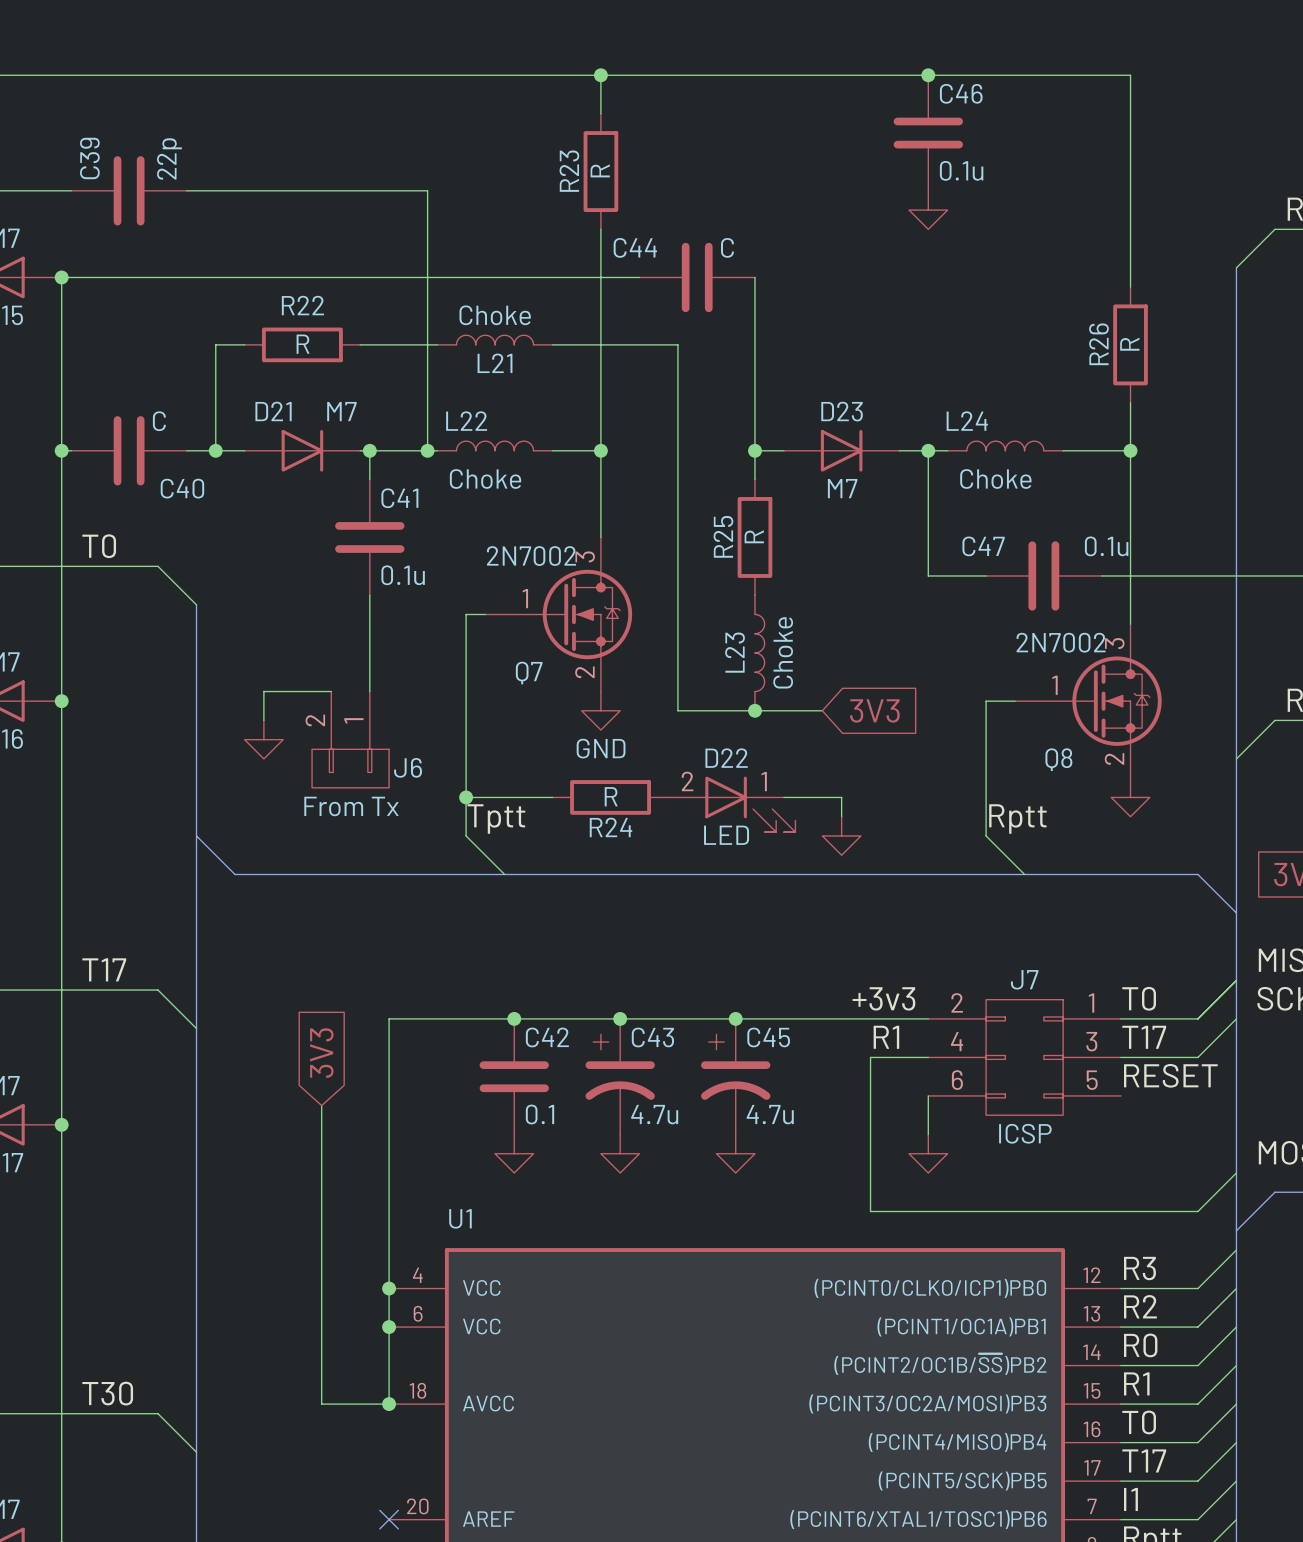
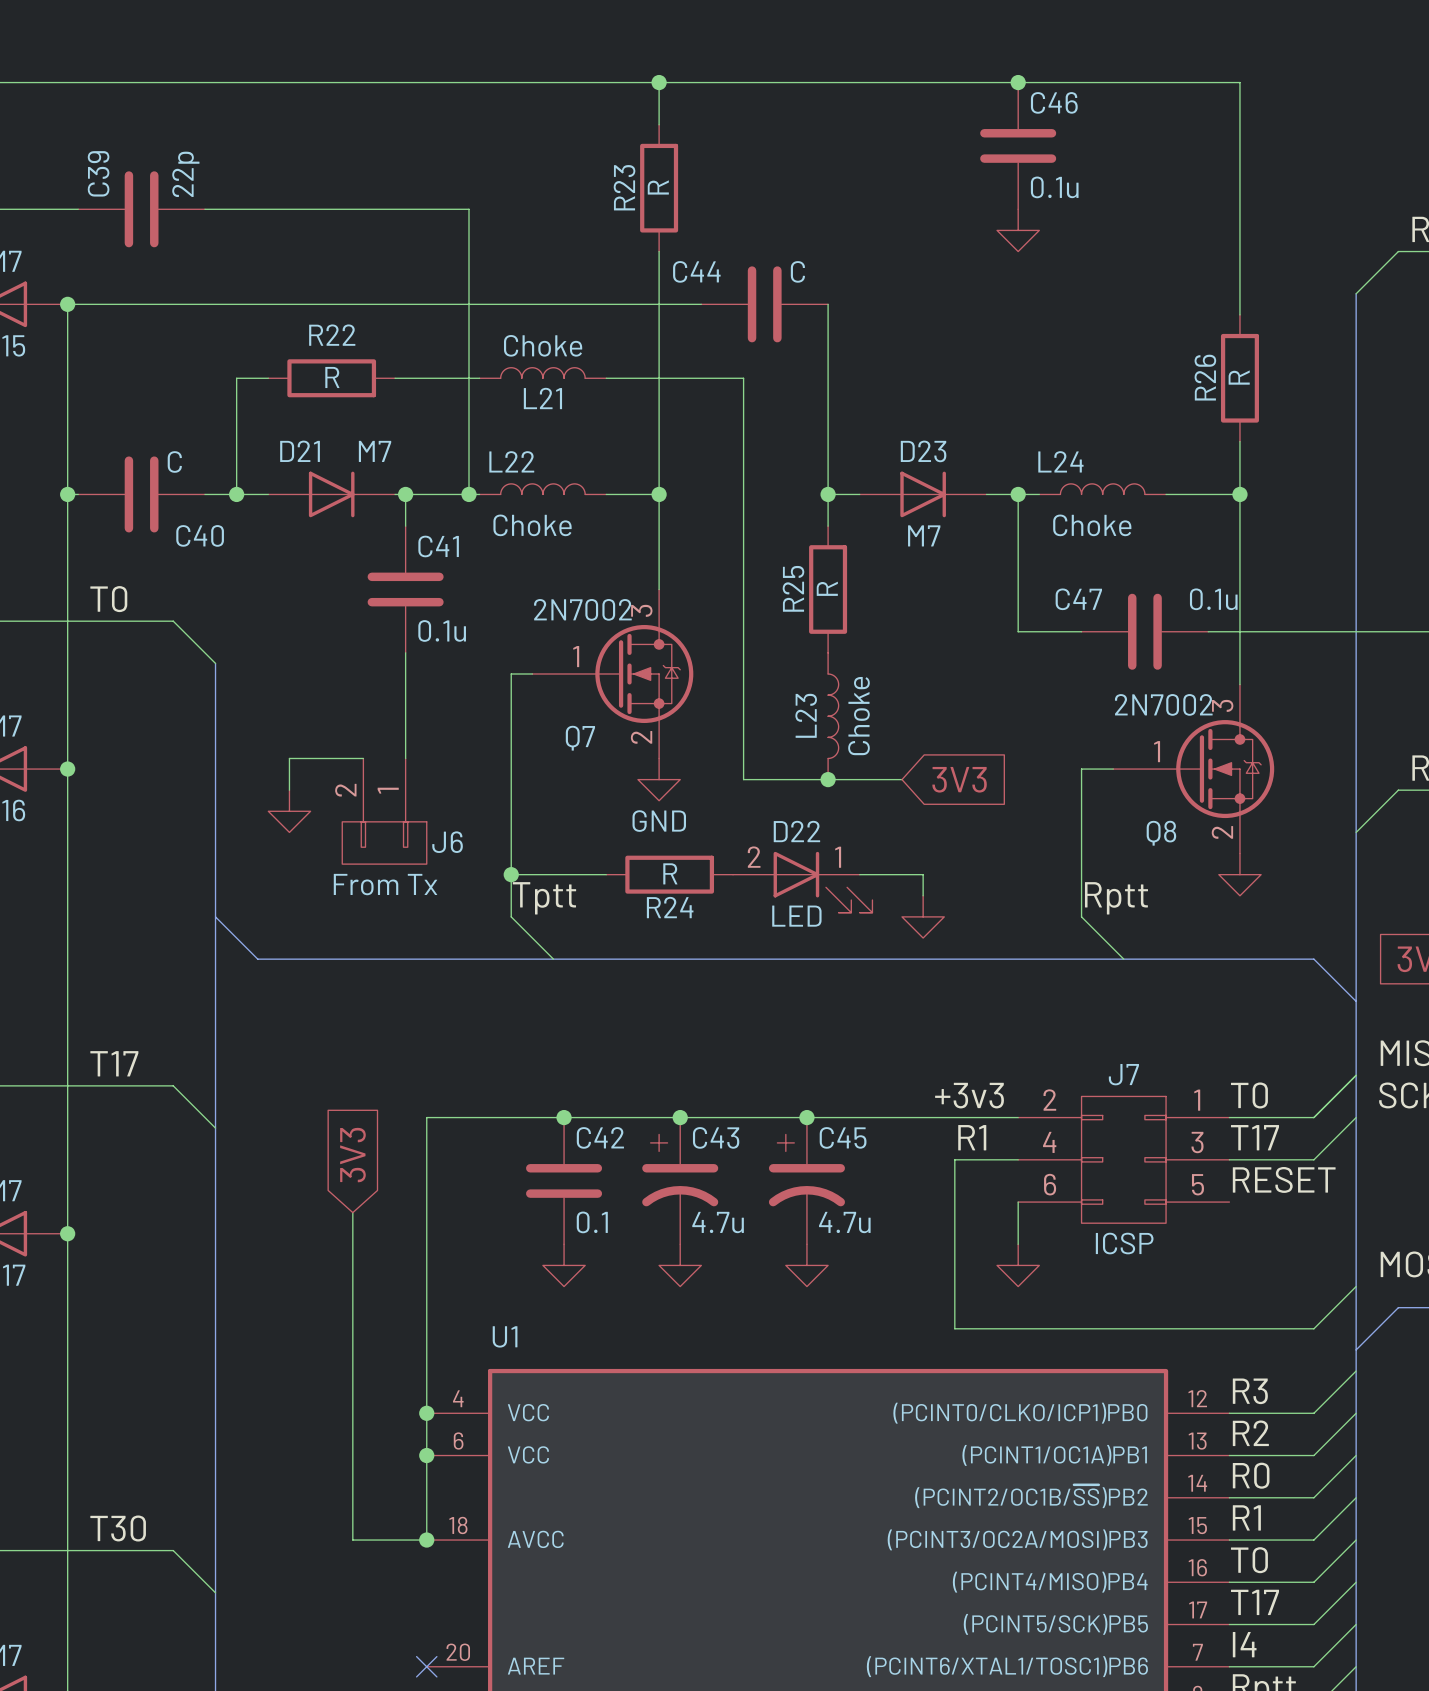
label: I1 (1130, 1499) -> I4 (1244, 1644)

